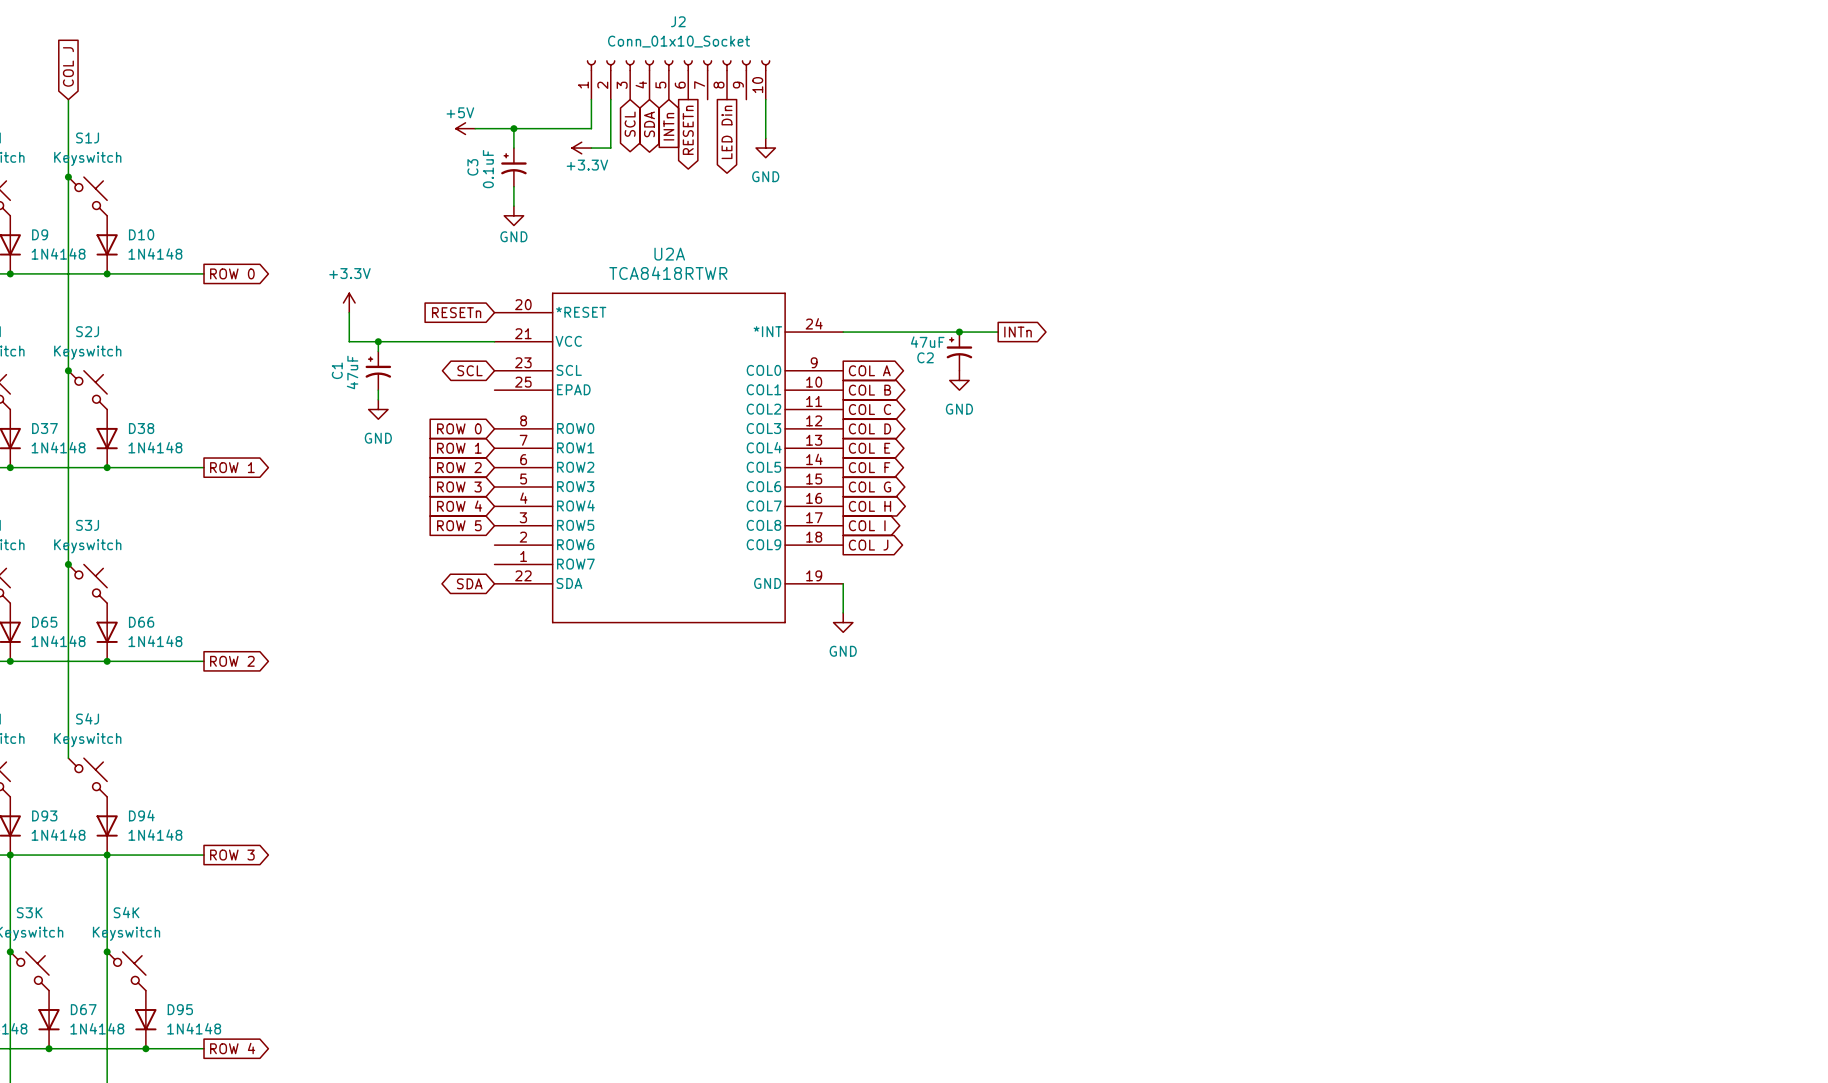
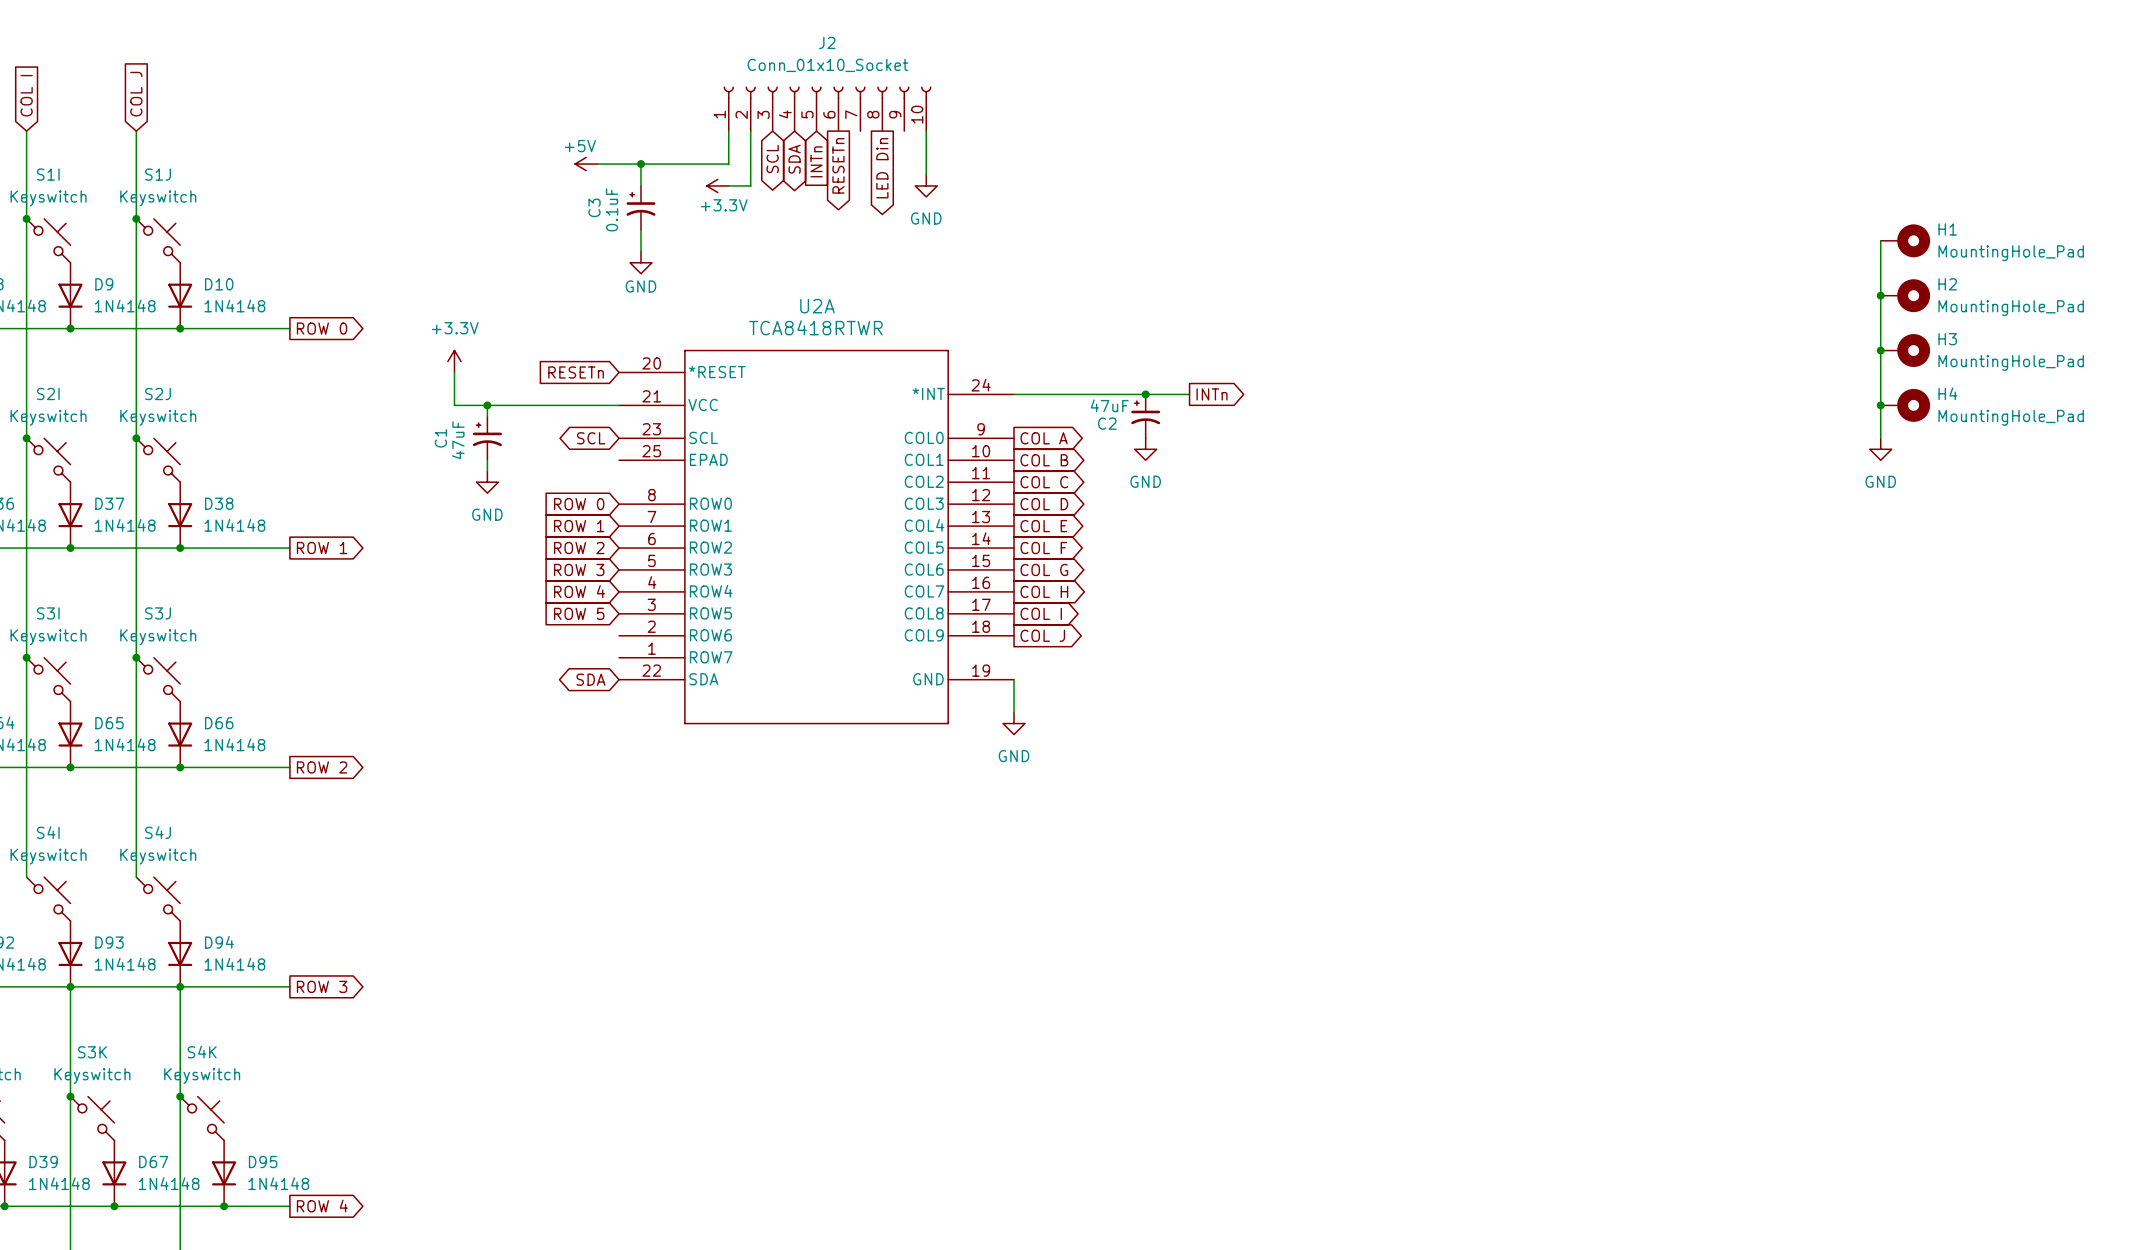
wire: none -> (1880, 240) (1880, 438)
H1: none -> MountingHole_Pad (1905, 240)
junction: none -> (1880, 295)
H2: none -> MountingHole_Pad (1905, 295)
junction: none -> (1880, 350)
H3: none -> MountingHole_Pad (1905, 350)
junction: none -> (1880, 405)
H4: none -> MountingHole_Pad (1905, 405)
power symbol: none -> GND (1880, 449)

